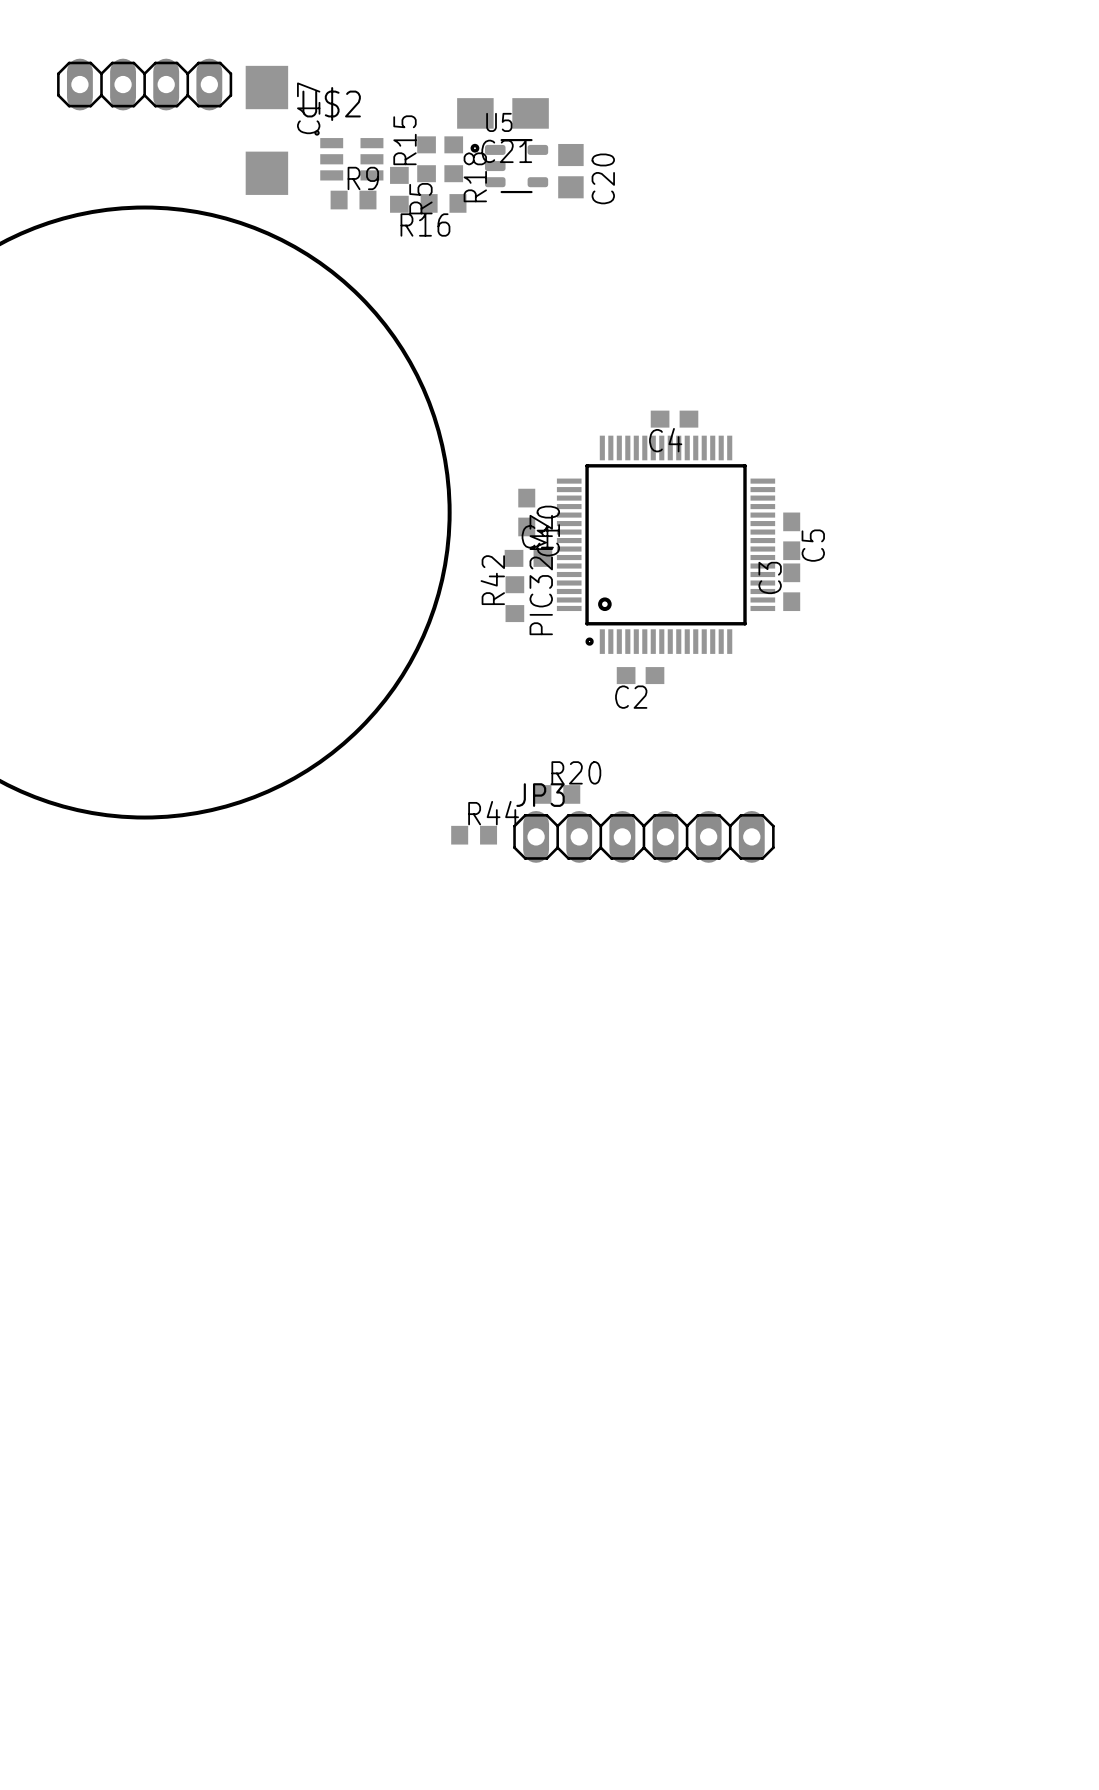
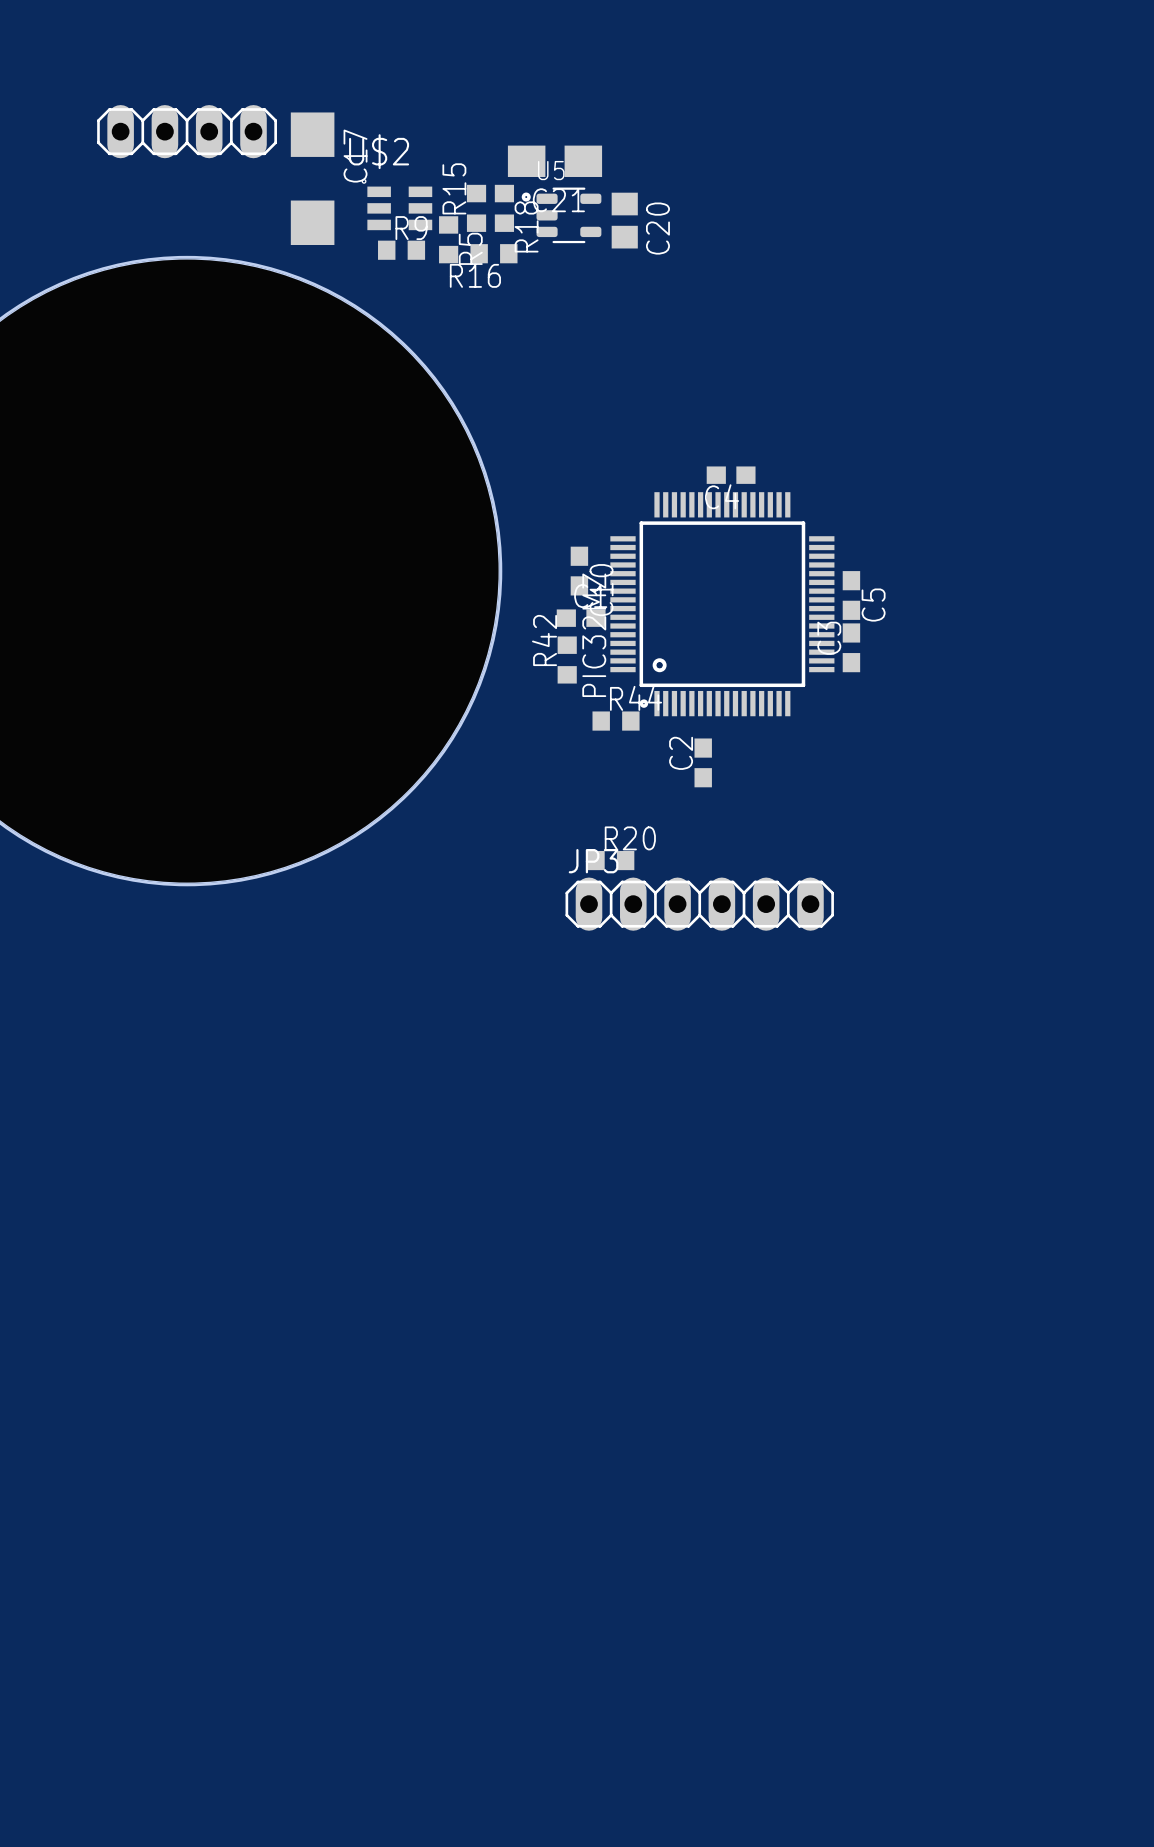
C2 rotation: 0° (640, 675) -> 90° clockwise (703, 762)
R44 position: (474, 835) -> (616, 721)

